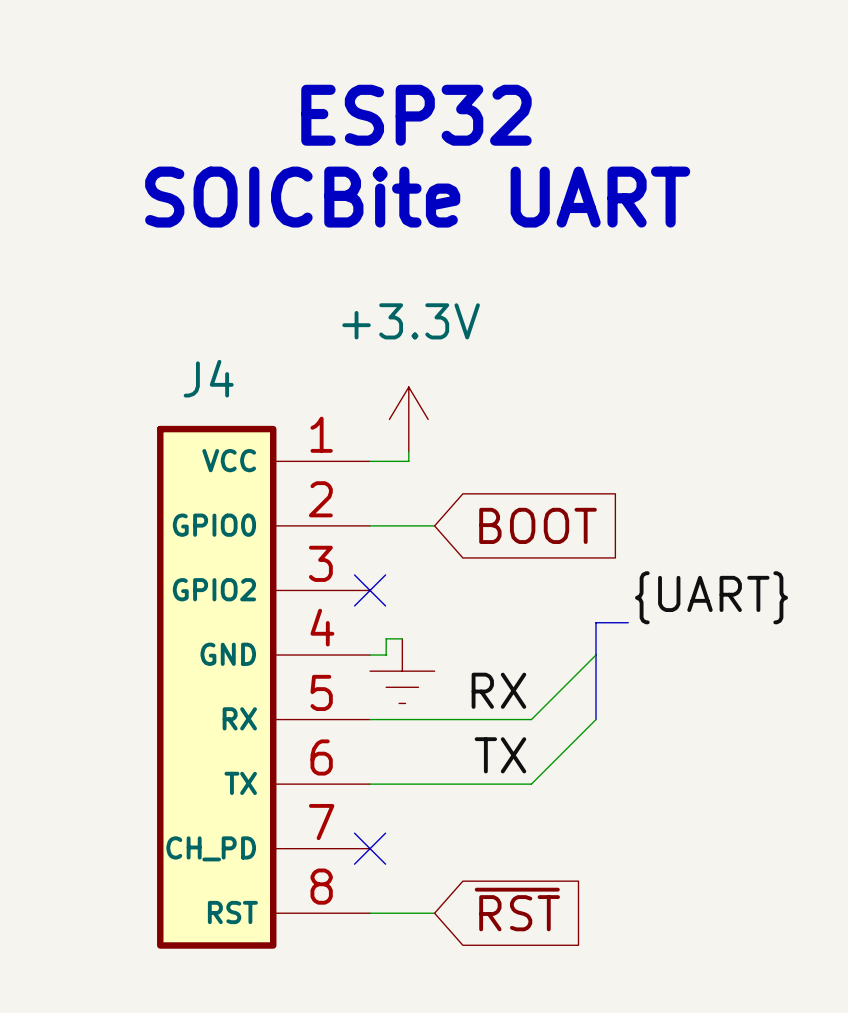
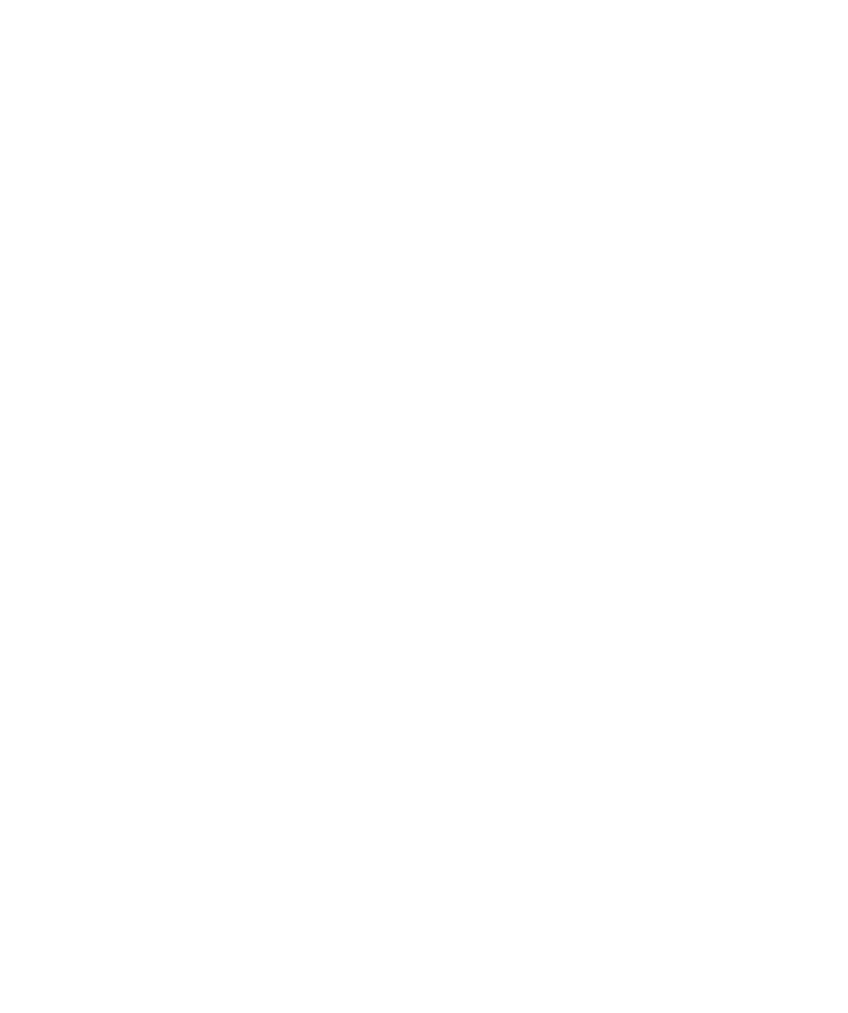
text: ESP32 (416, 115) -> none
text: SOICBite UART (417, 197) -> none
power symbol: +3.3V (408, 419) -> none
wire: (408, 451) (408, 461) (370, 461) -> none
wire: (370, 525) (434, 525) -> none
global label: BOOT (538, 525) -> none
no-connect mark: (370, 590) -> none
label: {UART} (711, 597) -> none
bus: (628, 622) (596, 622) (596, 719) -> none
wire: (402, 638) (386, 638) (386, 655) (370, 655) -> none
wire: (596, 655) (531, 719) (370, 719) -> none
power symbol: (402, 671) -> none
J4: (263, 687) -> none
label: RX (498, 690) -> none
wire: (596, 719) (531, 784) (370, 784) -> none
label: TX (500, 755) -> none
no-connect mark: (370, 848) -> none
global label: ~{RST} (517, 909) -> none
wire: (370, 913) (434, 913) -> none

